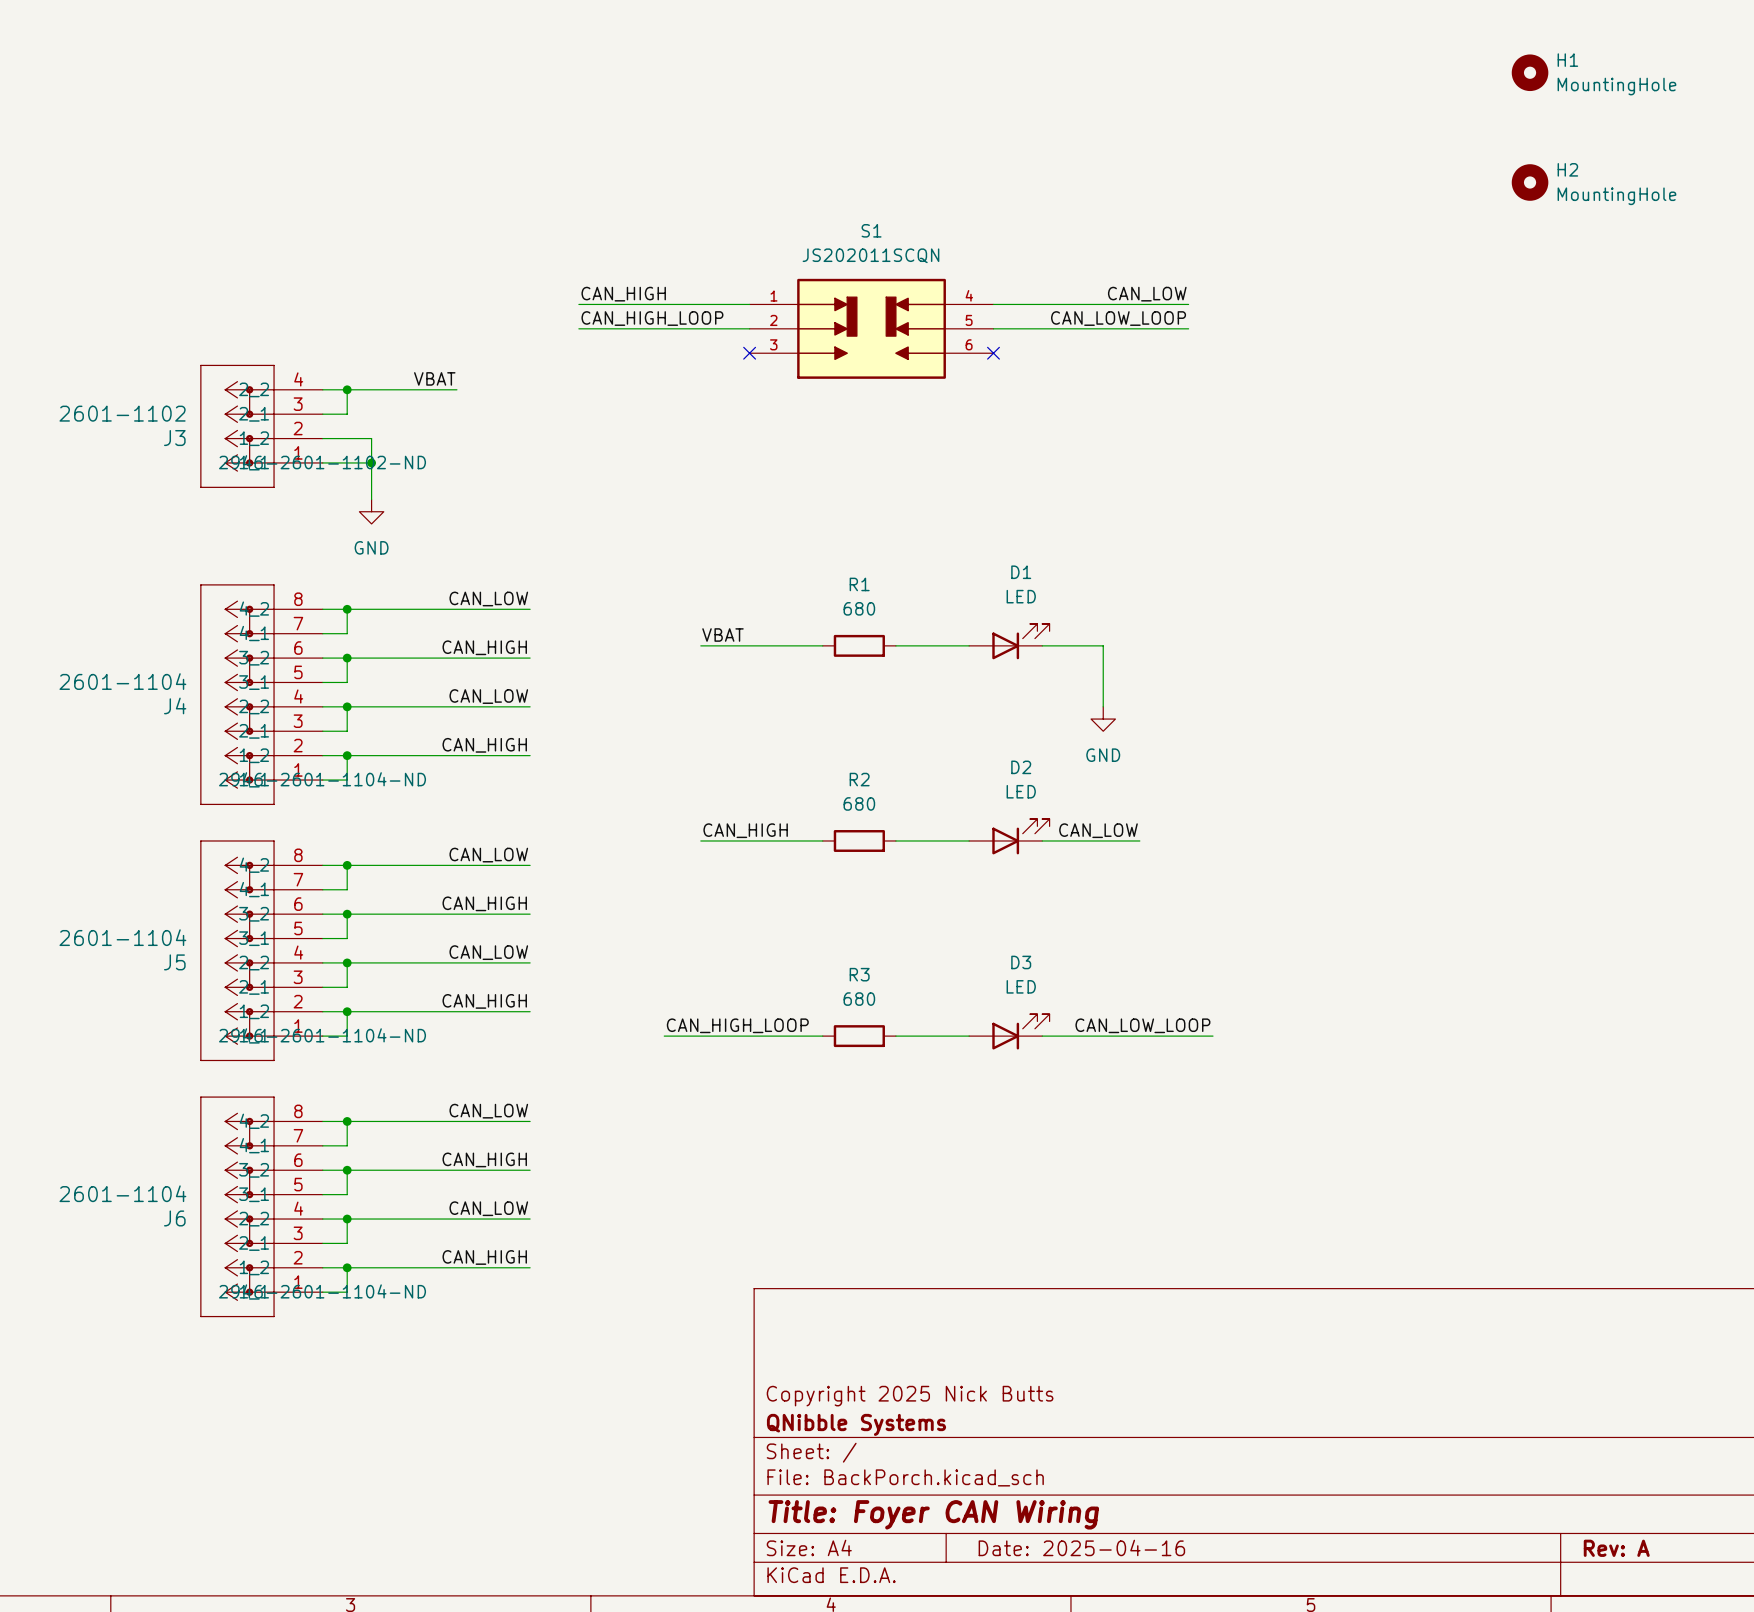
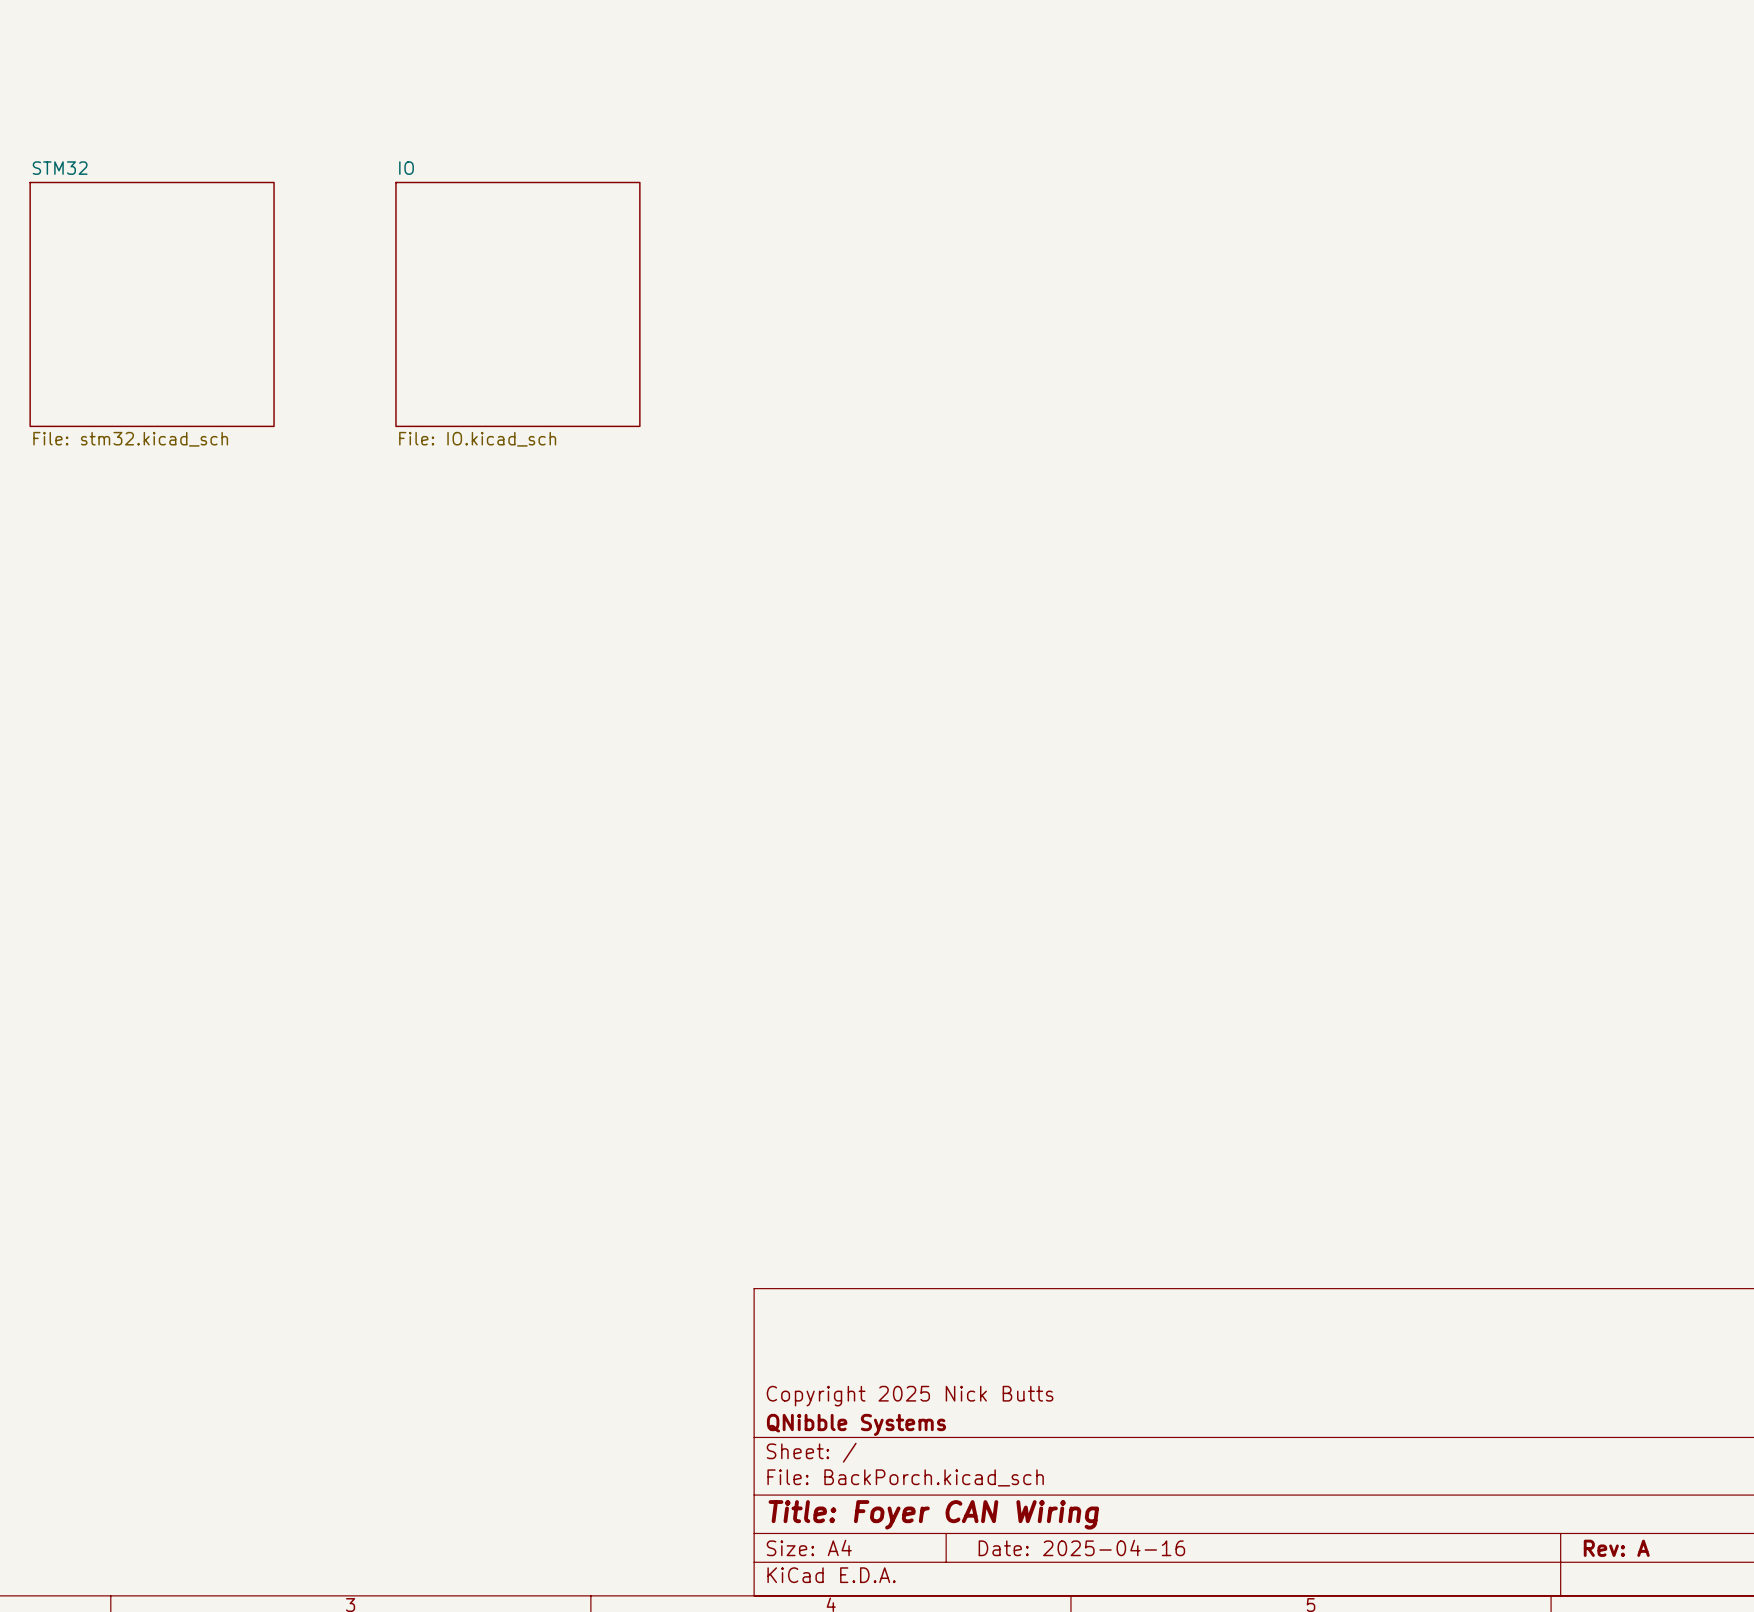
H1: MountingHole (1530, 72) -> none
H2: MountingHole (1530, 182) -> none
label: CAN_HIGH (623, 294) -> none
label: CAN_LOW (1147, 294) -> none
sheet STM32: none -> File: stm32.kicad_sch (152, 304)
sheet IO: none -> File: IO.kicad_sch (517, 304)
wire: (578, 304) (749, 304) -> none
wire: (993, 304) (1188, 304) -> none
label: CAN_HIGH_LOOP (652, 318) -> none
label: CAN_LOW_LOOP (1118, 318) -> none
wire: (578, 328) (749, 328) -> none
S1: JS202011SCQN (871, 328) -> none
wire: (993, 328) (1188, 328) -> none
no-connect mark: (749, 353) -> none
no-connect mark: (993, 353) -> none
label: VBAT (434, 378) -> none
wire: (322, 389) (456, 389) -> none
wire: (347, 389) (347, 414) (322, 414) -> none
junction: (347, 389) -> none
J3: 2601-1102 (261, 426) -> none
wire: (322, 438) (371, 438) (371, 499) -> none
wire: (322, 462) (371, 462) -> none
junction: (371, 462) -> none
power symbol: GND (371, 511) -> none
label: CAN_LOW (488, 599) -> none
wire: (322, 609) (530, 609) -> none
wire: (347, 609) (347, 633) (322, 633) -> none
junction: (347, 609) -> none
label: VBAT (722, 635) -> none
D1: LED (1009, 641) -> none
wire: (700, 645) (822, 645) -> none
R1: 680 (859, 645) -> none
wire: (895, 645) (969, 645) -> none
wire: (1042, 645) (1103, 645) (1103, 706) -> none
label: CAN_HIGH (484, 647) -> none
wire: (322, 658) (530, 658) -> none
wire: (347, 658) (347, 682) (322, 682) -> none
junction: (347, 658) -> none
J4: 2601-1104 (261, 694) -> none
label: CAN_LOW (488, 696) -> none
wire: (322, 706) (530, 706) -> none
wire: (347, 706) (347, 731) (322, 731) -> none
junction: (347, 706) -> none
power symbol: GND (1103, 719) -> none
label: CAN_HIGH (484, 745) -> none
wire: (322, 755) (530, 755) -> none
wire: (347, 755) (347, 780) (322, 780) -> none
junction: (347, 755) -> none
label: CAN_HIGH (745, 830) -> none
label: CAN_LOW (1098, 830) -> none
D2: LED (1009, 836) -> none
wire: (700, 840) (822, 840) -> none
R2: 680 (859, 840) -> none
wire: (895, 840) (969, 840) -> none
wire: (1042, 840) (1139, 840) -> none
label: CAN_LOW (488, 855) -> none
wire: (322, 865) (530, 865) -> none
wire: (347, 865) (347, 889) (322, 889) -> none
junction: (347, 865) -> none
label: CAN_HIGH (484, 903) -> none
wire: (322, 914) (530, 914) -> none
wire: (347, 914) (347, 938) (322, 938) -> none
junction: (347, 914) -> none
J5: 2601-1104 (261, 950) -> none
label: CAN_LOW (488, 952) -> none
wire: (322, 962) (530, 962) -> none
wire: (347, 962) (347, 987) (322, 987) -> none
junction: (347, 962) -> none
label: CAN_HIGH (484, 1001) -> none
wire: (322, 1011) (530, 1011) -> none
wire: (347, 1011) (347, 1036) (322, 1036) -> none
junction: (347, 1011) -> none
label: CAN_HIGH_LOOP (737, 1025) -> none
label: CAN_LOW_LOOP (1142, 1025) -> none
D3: LED (1009, 1031) -> none
wire: (664, 1036) (822, 1036) -> none
R3: 680 (859, 1036) -> none
wire: (895, 1036) (969, 1036) -> none
wire: (1042, 1036) (1212, 1036) -> none
label: CAN_LOW (488, 1111) -> none
wire: (322, 1121) (530, 1121) -> none
wire: (347, 1121) (347, 1145) (322, 1145) -> none
junction: (347, 1121) -> none
label: CAN_HIGH (484, 1159) -> none
wire: (322, 1170) (530, 1170) -> none
wire: (347, 1170) (347, 1194) (322, 1194) -> none
junction: (347, 1170) -> none
J6: 2601-1104 (261, 1206) -> none
label: CAN_LOW (488, 1208) -> none
wire: (322, 1219) (530, 1219) -> none
wire: (347, 1219) (347, 1243) (322, 1243) -> none
junction: (347, 1219) -> none
label: CAN_HIGH (484, 1257) -> none
wire: (322, 1267) (530, 1267) -> none
wire: (347, 1267) (347, 1292) (322, 1292) -> none
junction: (347, 1267) -> none

